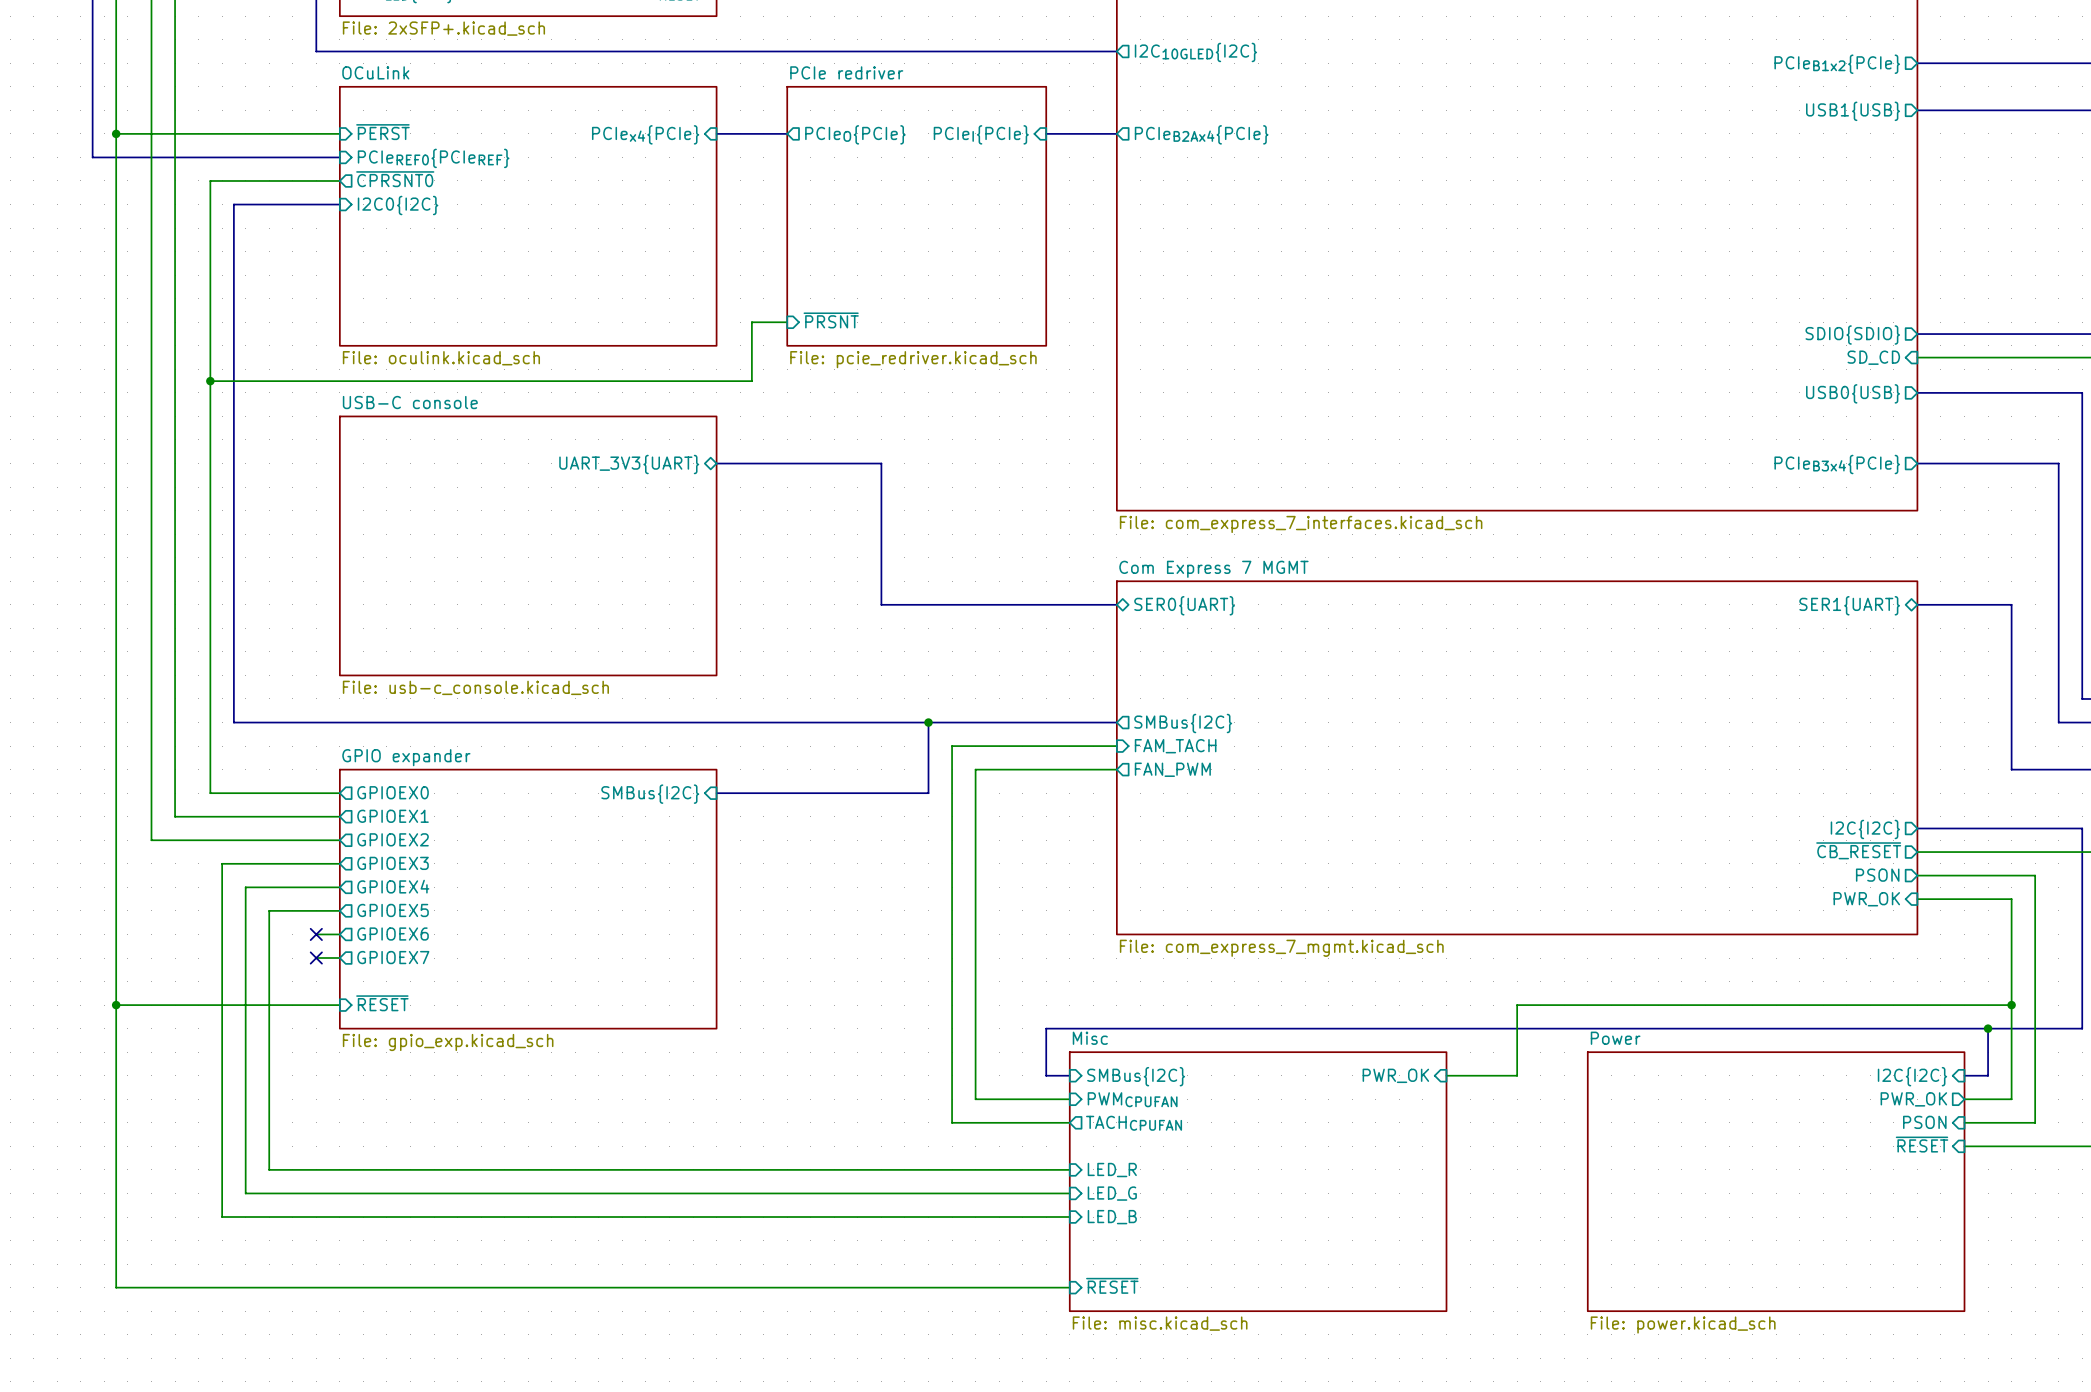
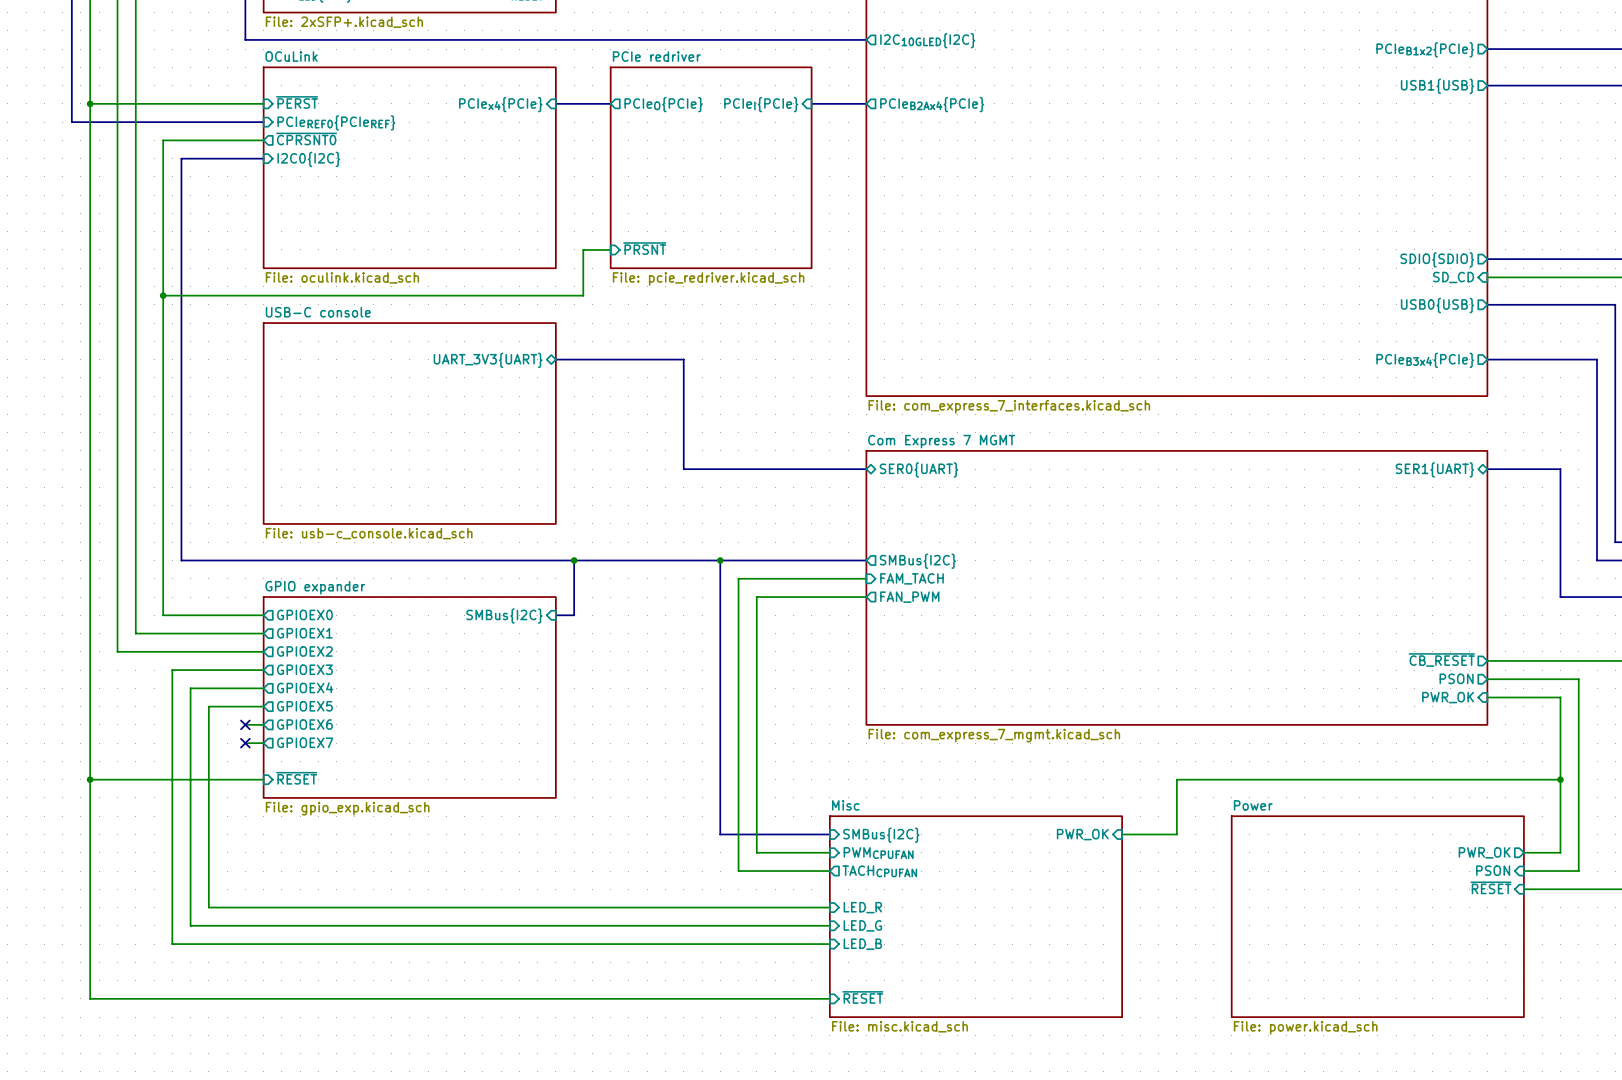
junction: none -> (574, 560)
bus: (740, 793) (928, 793) -> (574, 615) (574, 560)
bus: (1917, 828) (2082, 828) (2082, 1028) (1046, 1028) (1046, 1075) -> (720, 615) (720, 834) (811, 834)
sheet pin: I2C{I2C} (1865, 829) -> none
bus: (1988, 1028) (1988, 1075) (1964, 1075) -> none
junction: (1988, 1028) -> none
sheet pin: I2C{I2C} (1912, 1076) -> none

